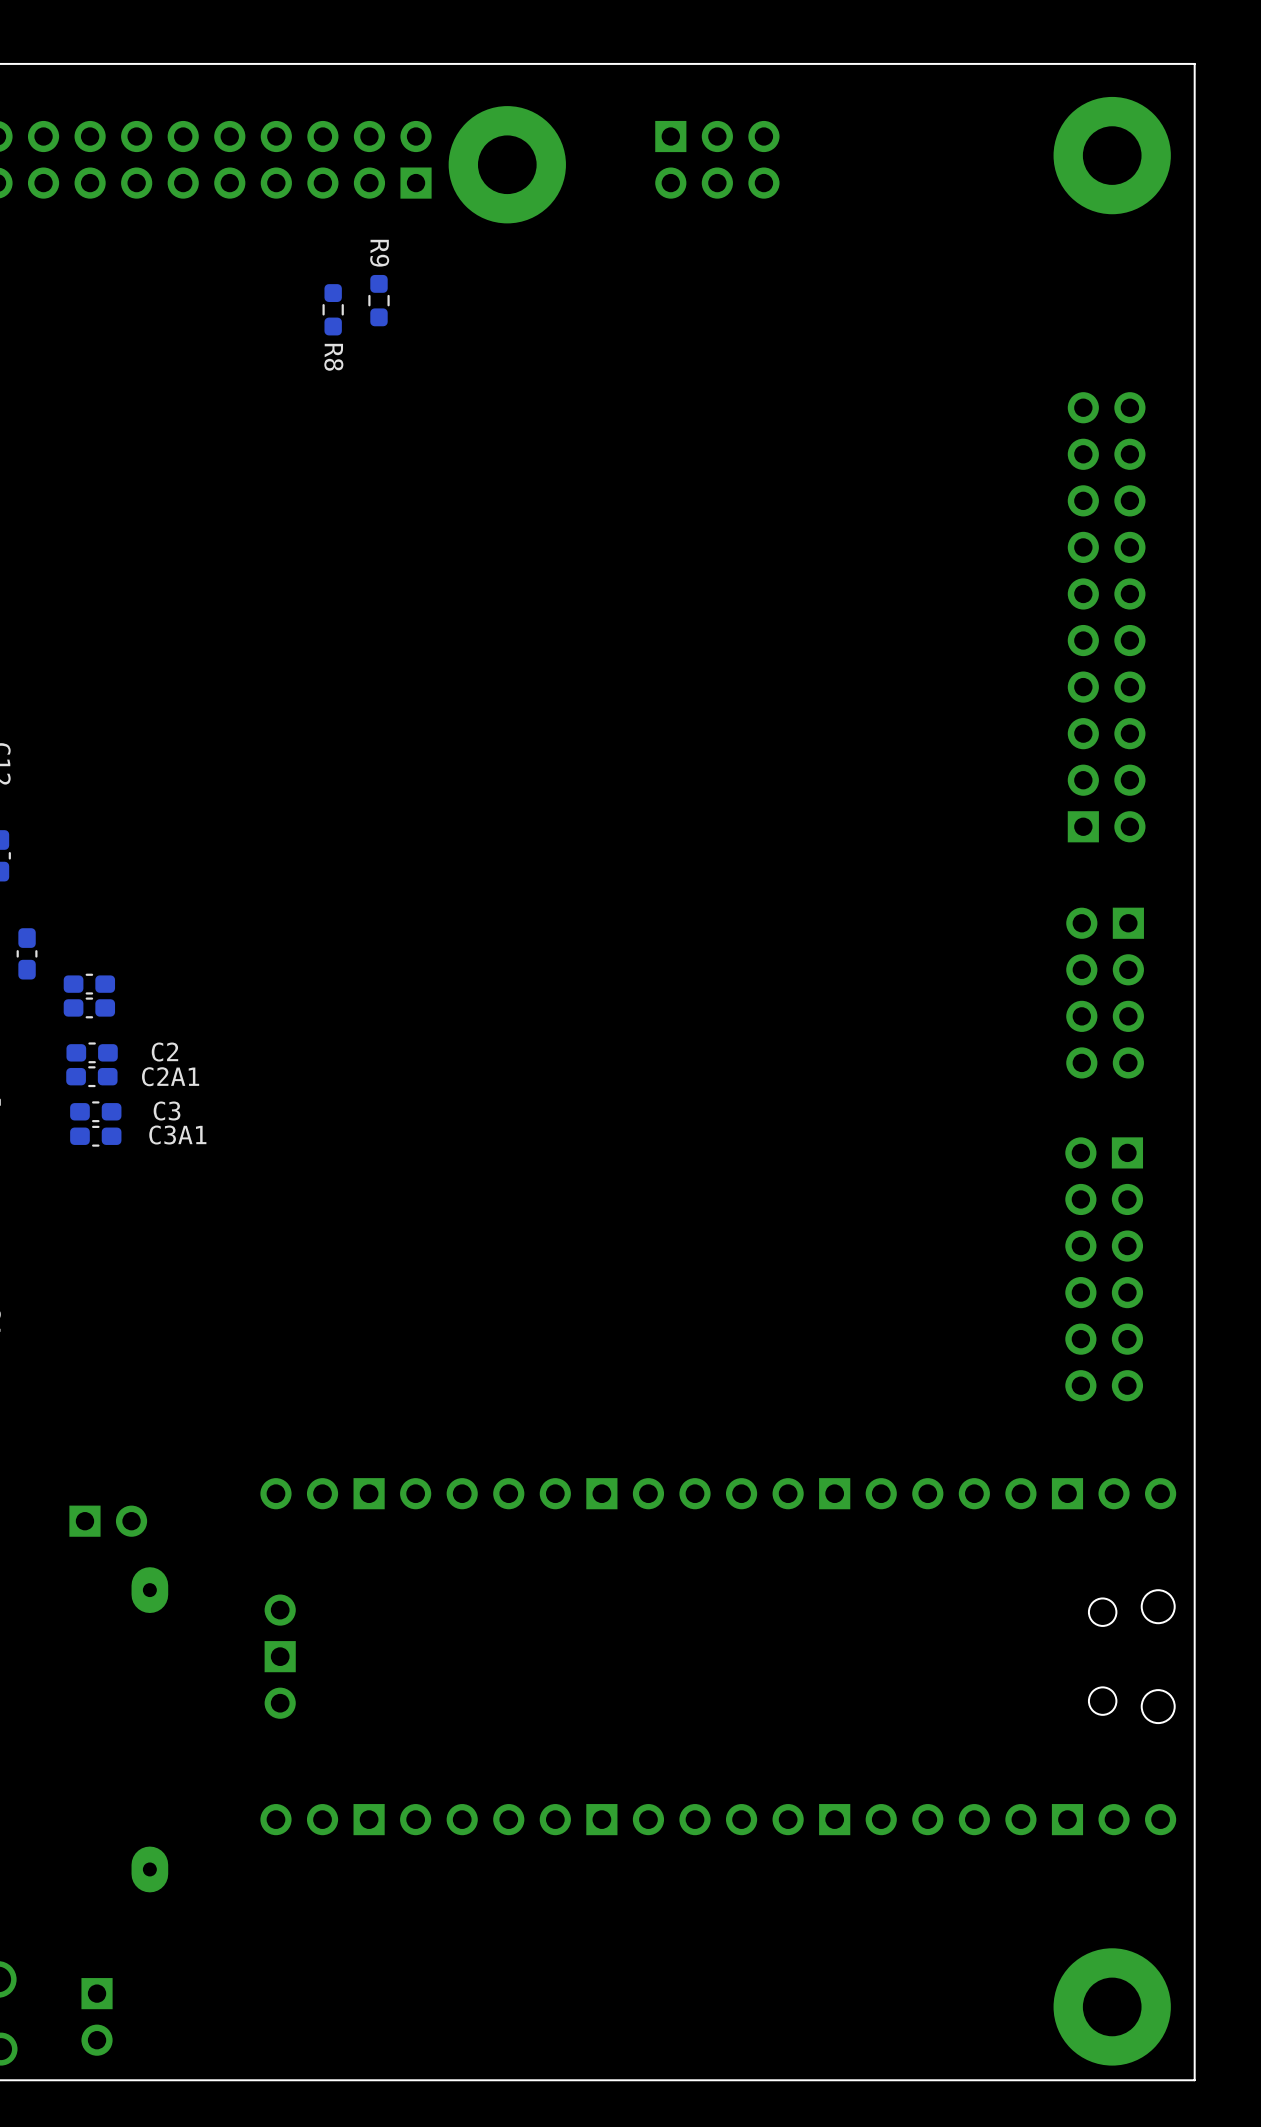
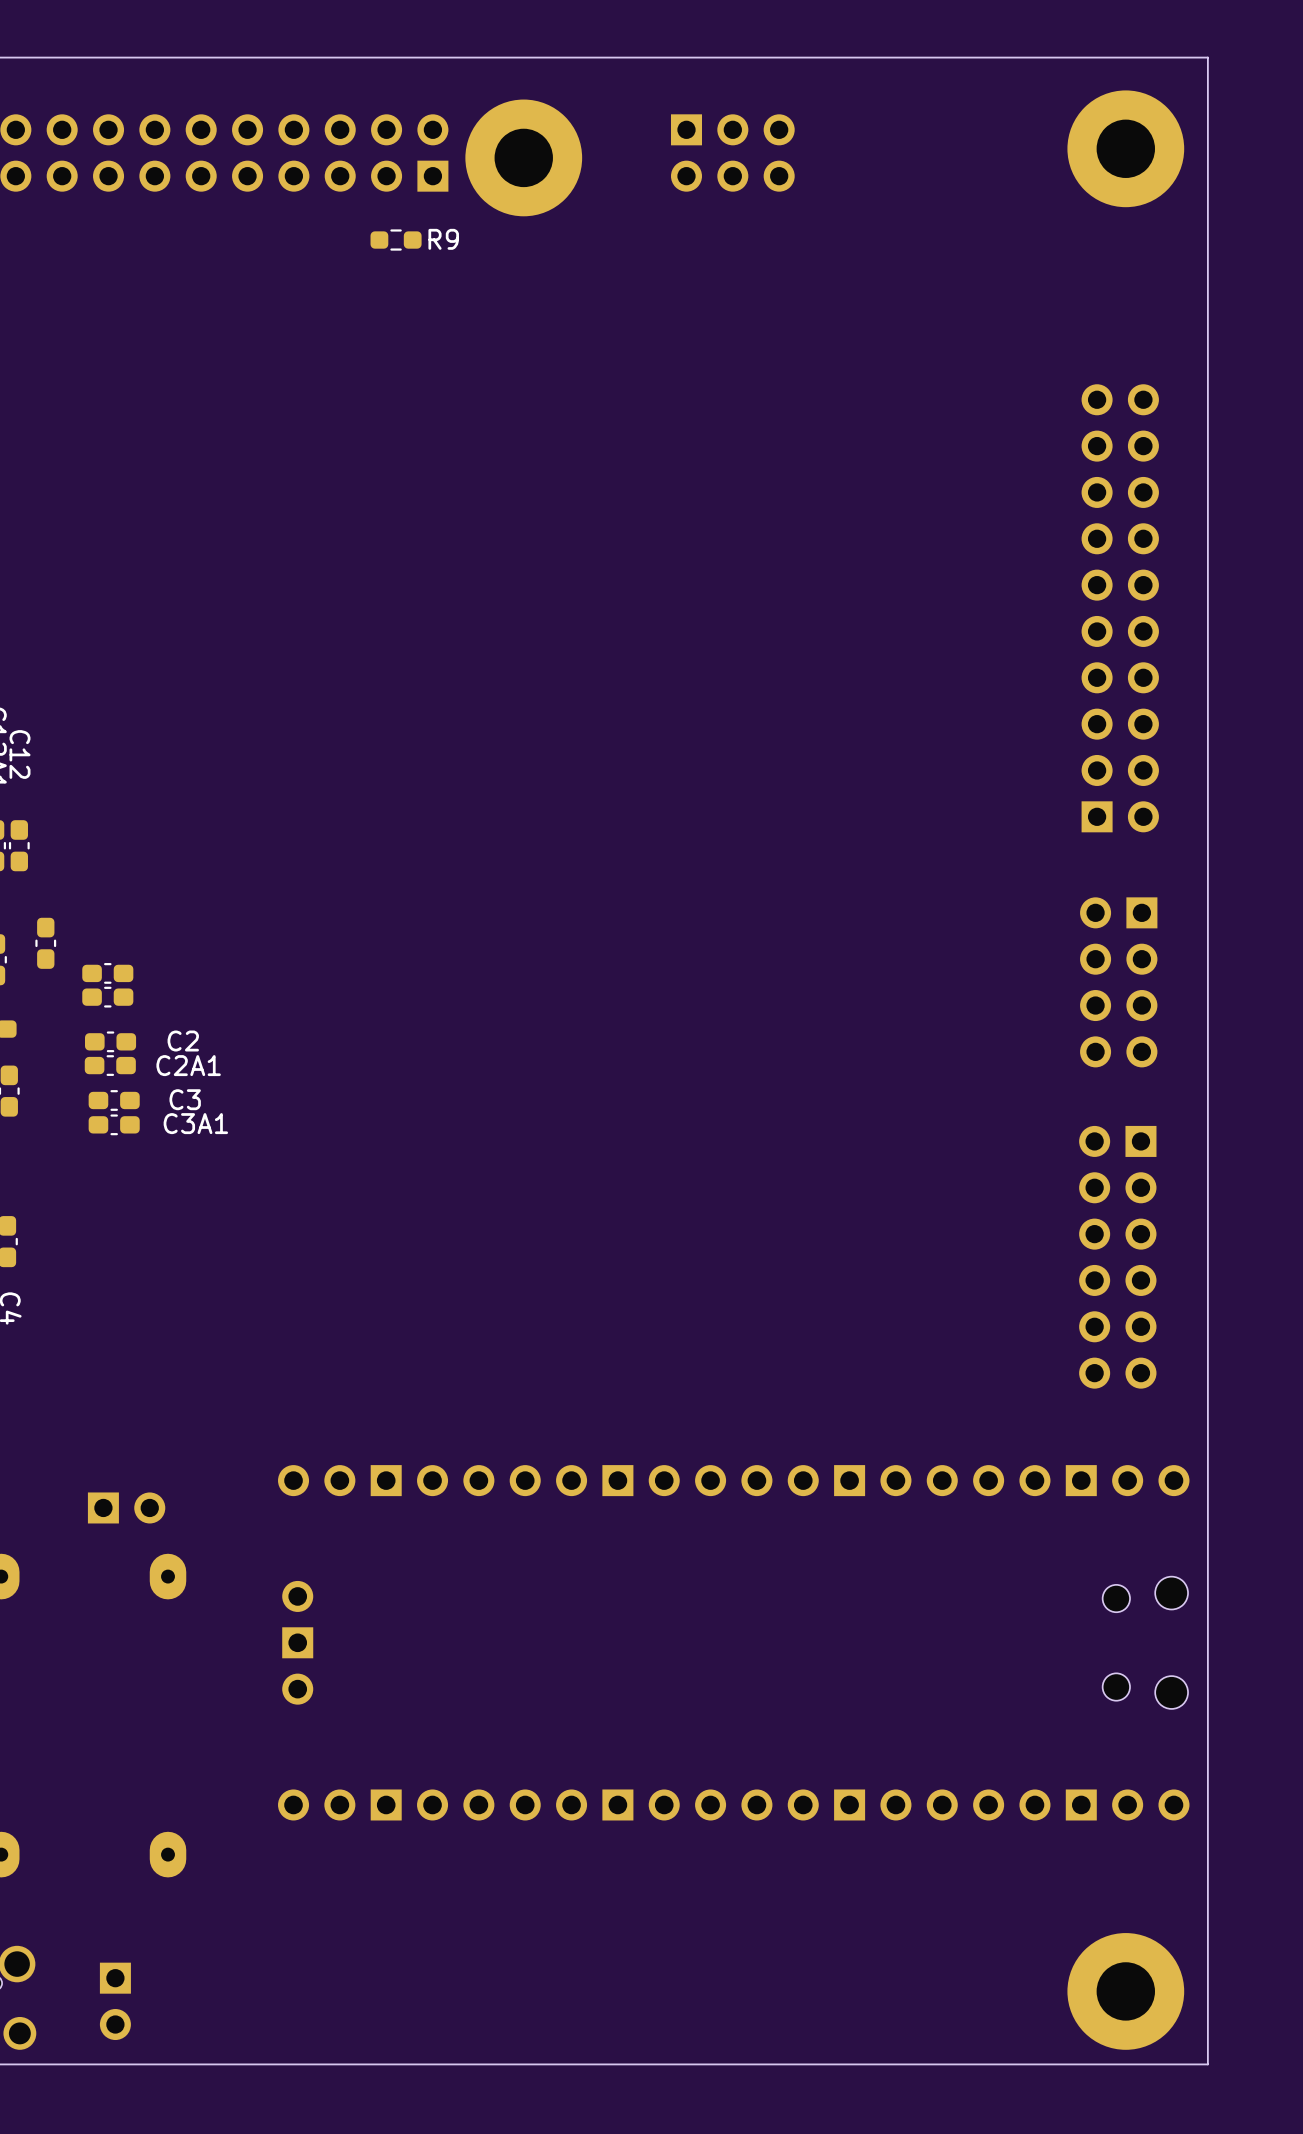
R9 rotation: 0° (378, 300) -> 90° clockwise (396, 240)
R9 position: (378, 300) -> (396, 240)
R8: (333, 309) -> none

